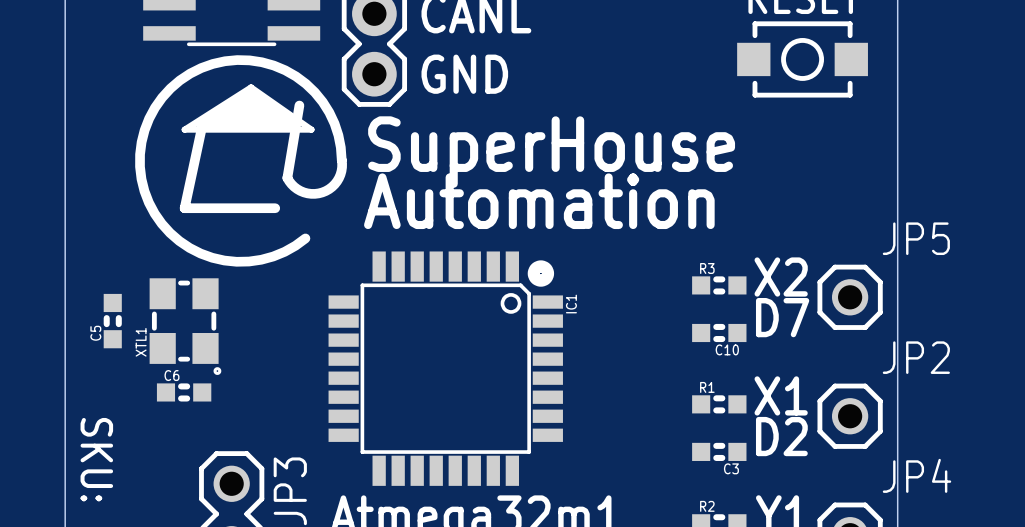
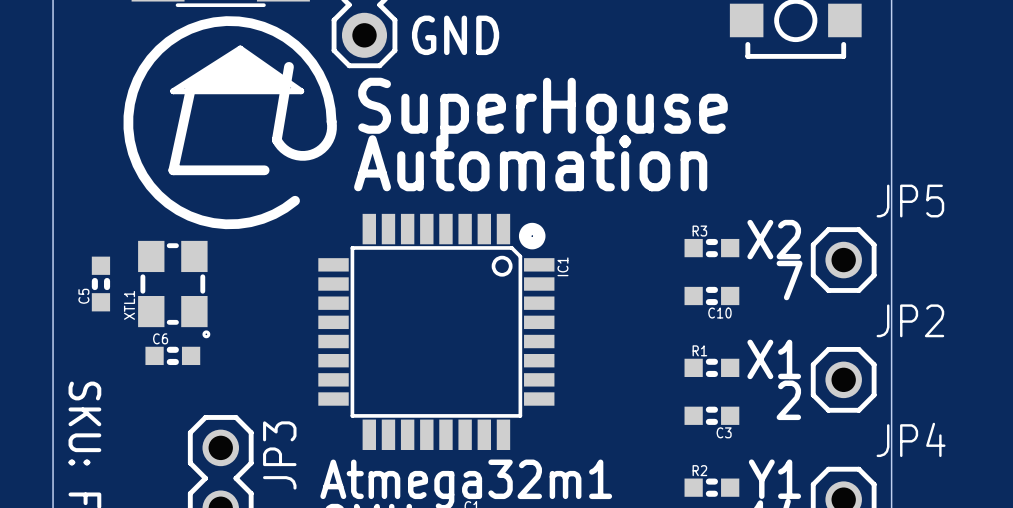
text: D7 (782, 317) -> 7 (789, 280)
text: D2 (781, 436) -> 2 (788, 400)

